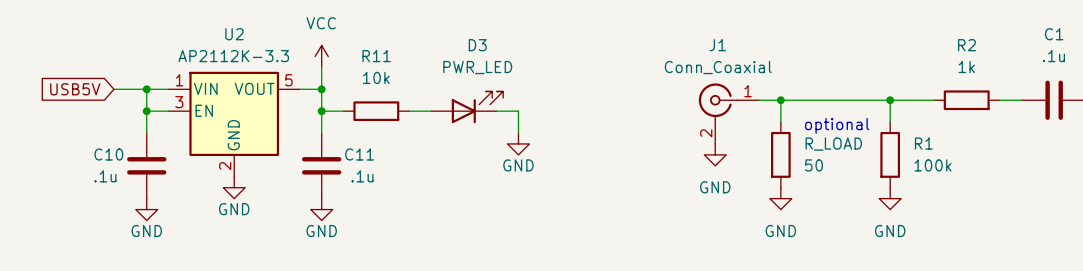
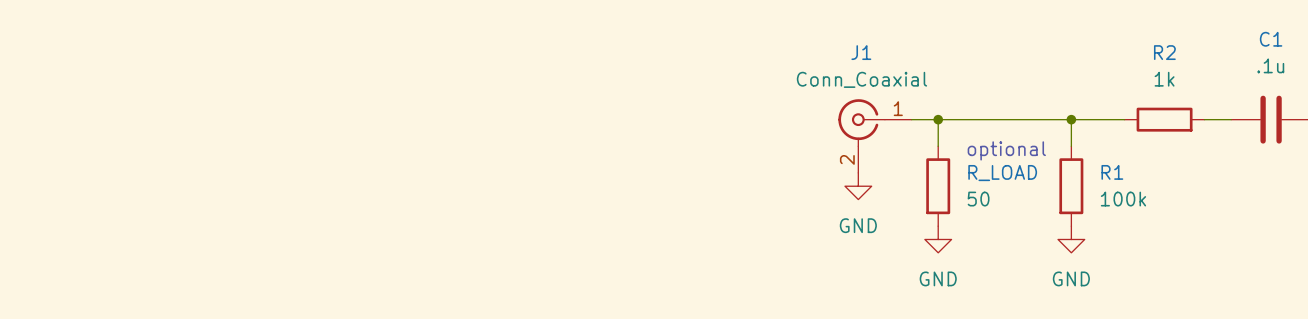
power symbol: VCC (321, 56) -> none
wire: (321, 67) (321, 133) -> none
global label: USB5V (75, 89) -> none
wire: (113, 89) (168, 89) -> none
wire: (146, 89) (146, 133) -> none
junction: (146, 89) -> none
wire: (299, 89) (321, 89) -> none
junction: (321, 89) -> none
D3: PWR_LED (467, 107) -> none
wire: (146, 111) (168, 111) -> none
junction: (146, 111) -> none
wire: (321, 111) (343, 111) -> none
junction: (321, 111) -> none
R11: 10k (376, 111) -> none
wire: (409, 111) (431, 111) -> none
wire: (496, 111) (518, 111) (518, 133) -> none
U2: AP2112K-3.3 (234, 124) -> none
power symbol: GND (518, 143) -> none
C10: .1u (146, 165) -> none
C11: .1u (321, 165) -> none
power symbol: GND (234, 187) -> none
power symbol: GND (146, 209) -> none
power symbol: GND (321, 209) -> none

